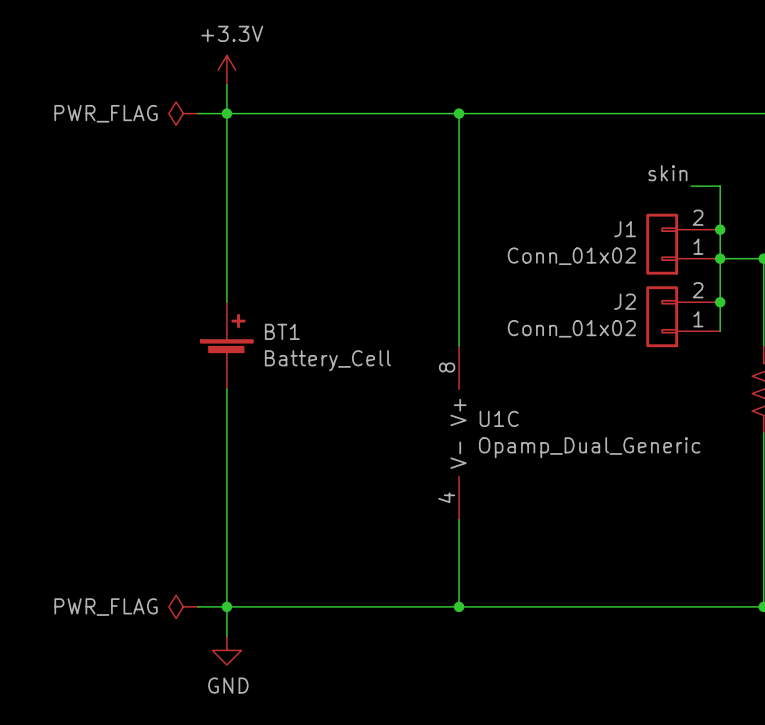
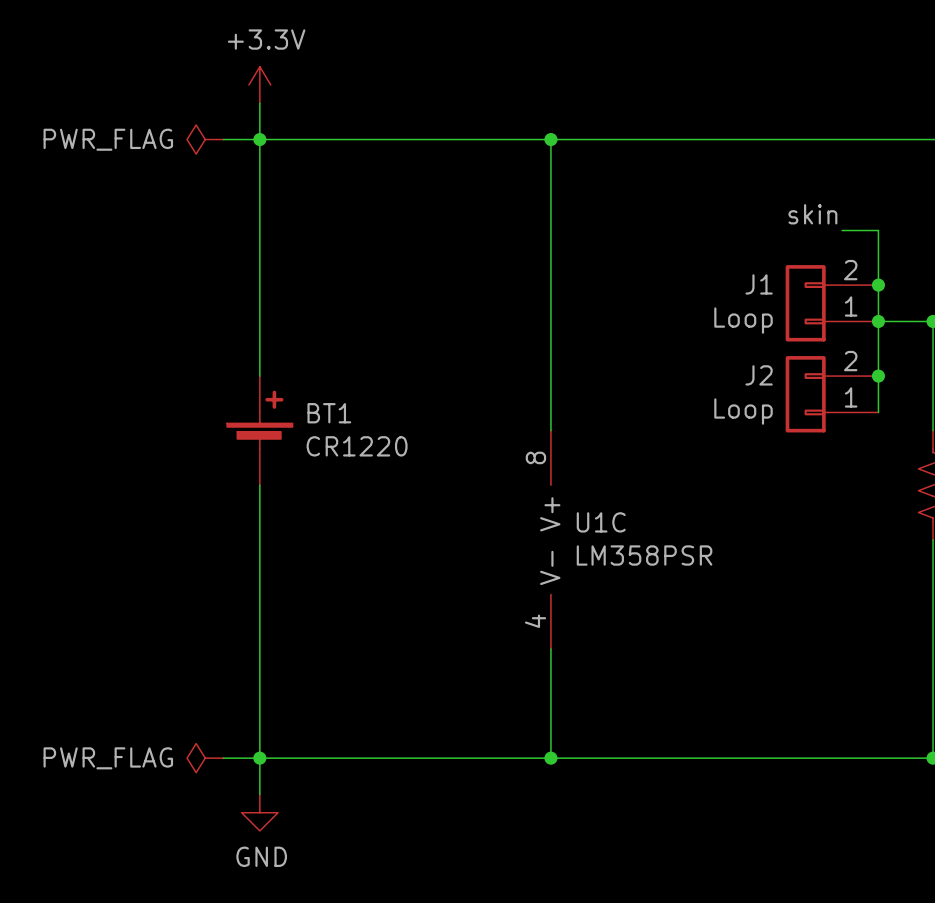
J1 value: Conn_01x02 (571, 256) -> Loop (743, 320)
J2 value: Conn_01x02 (571, 328) -> Loop (743, 411)
BT1 value: Battery_Cell (327, 360) -> CR1220 (357, 446)
U1C value: Opamp_Dual_Generic (589, 447) -> LM358PSR (644, 555)

